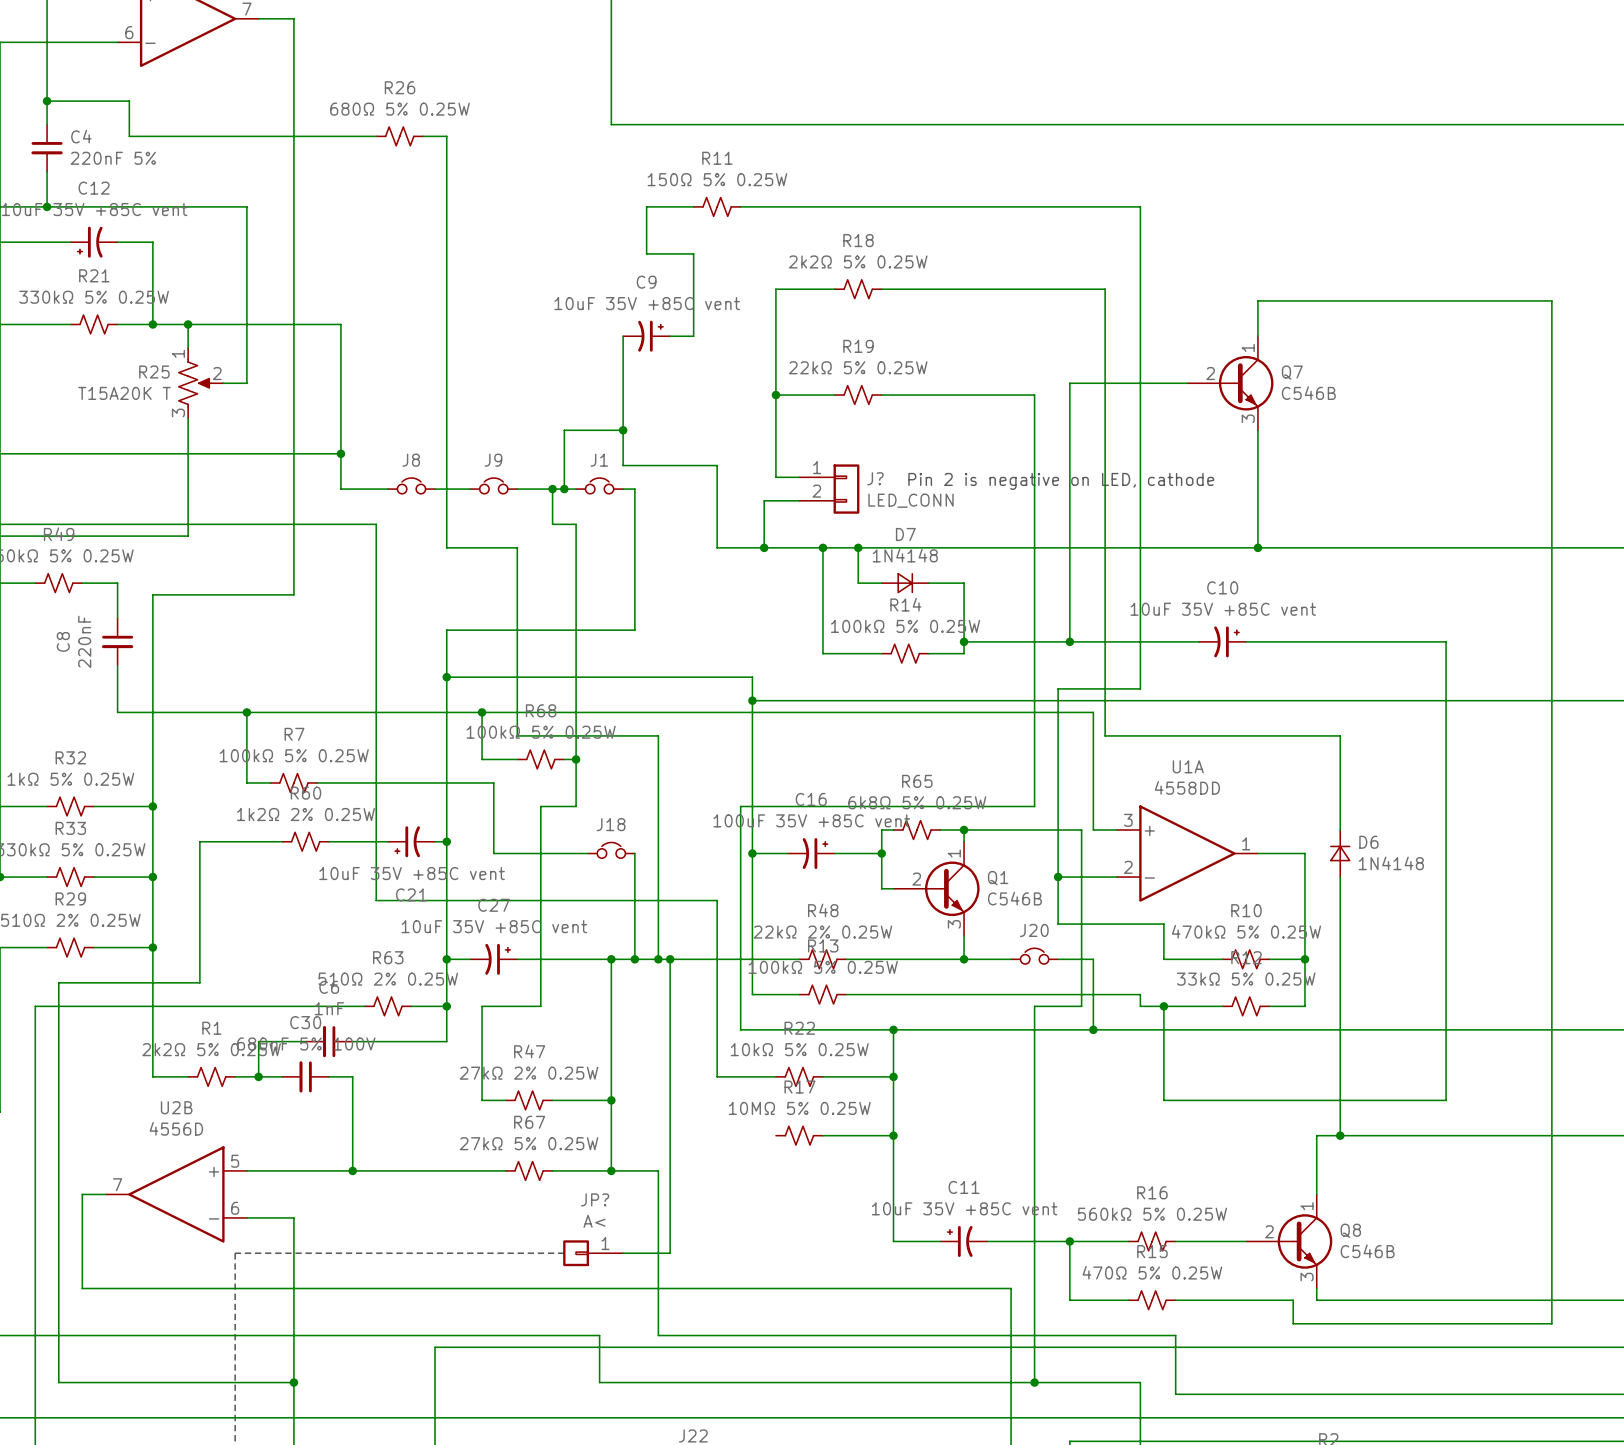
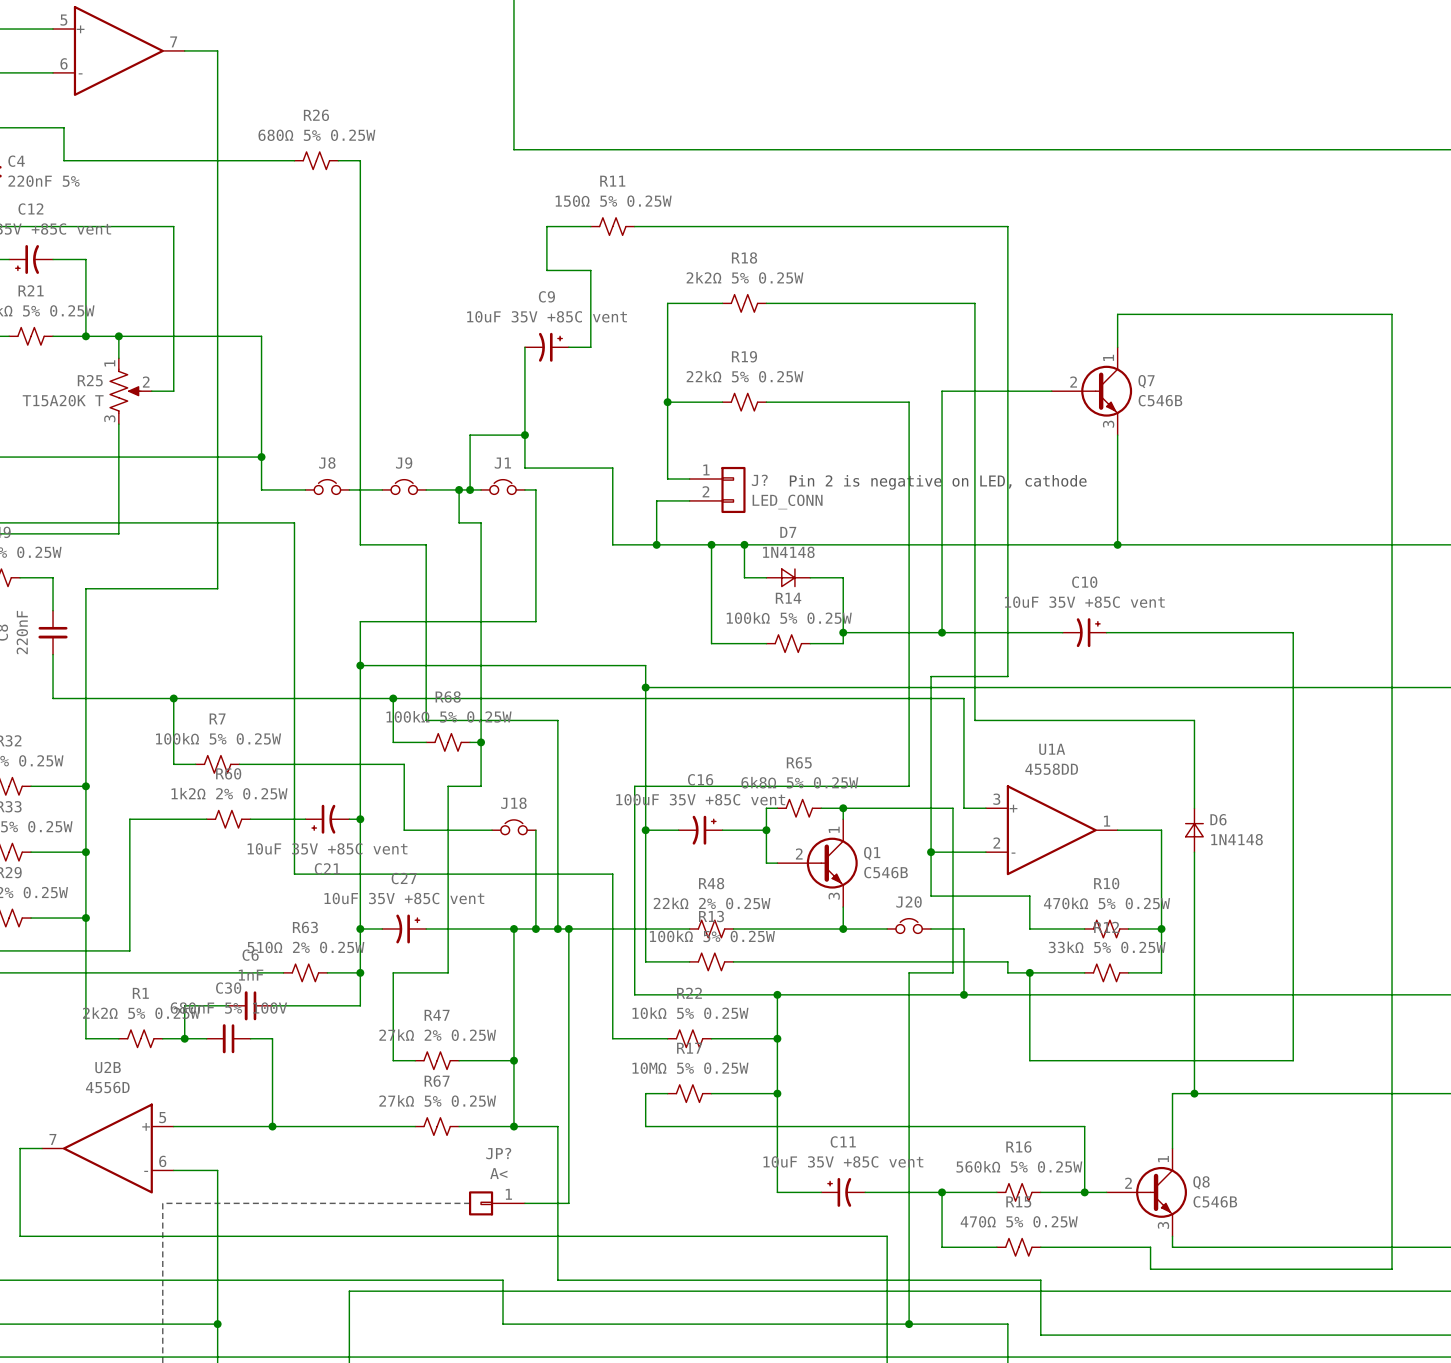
wire: none -> (667, 1093) (645, 1093) (645, 1126) (1084, 1126) (1084, 1192)
junction: none -> (1084, 1192)

